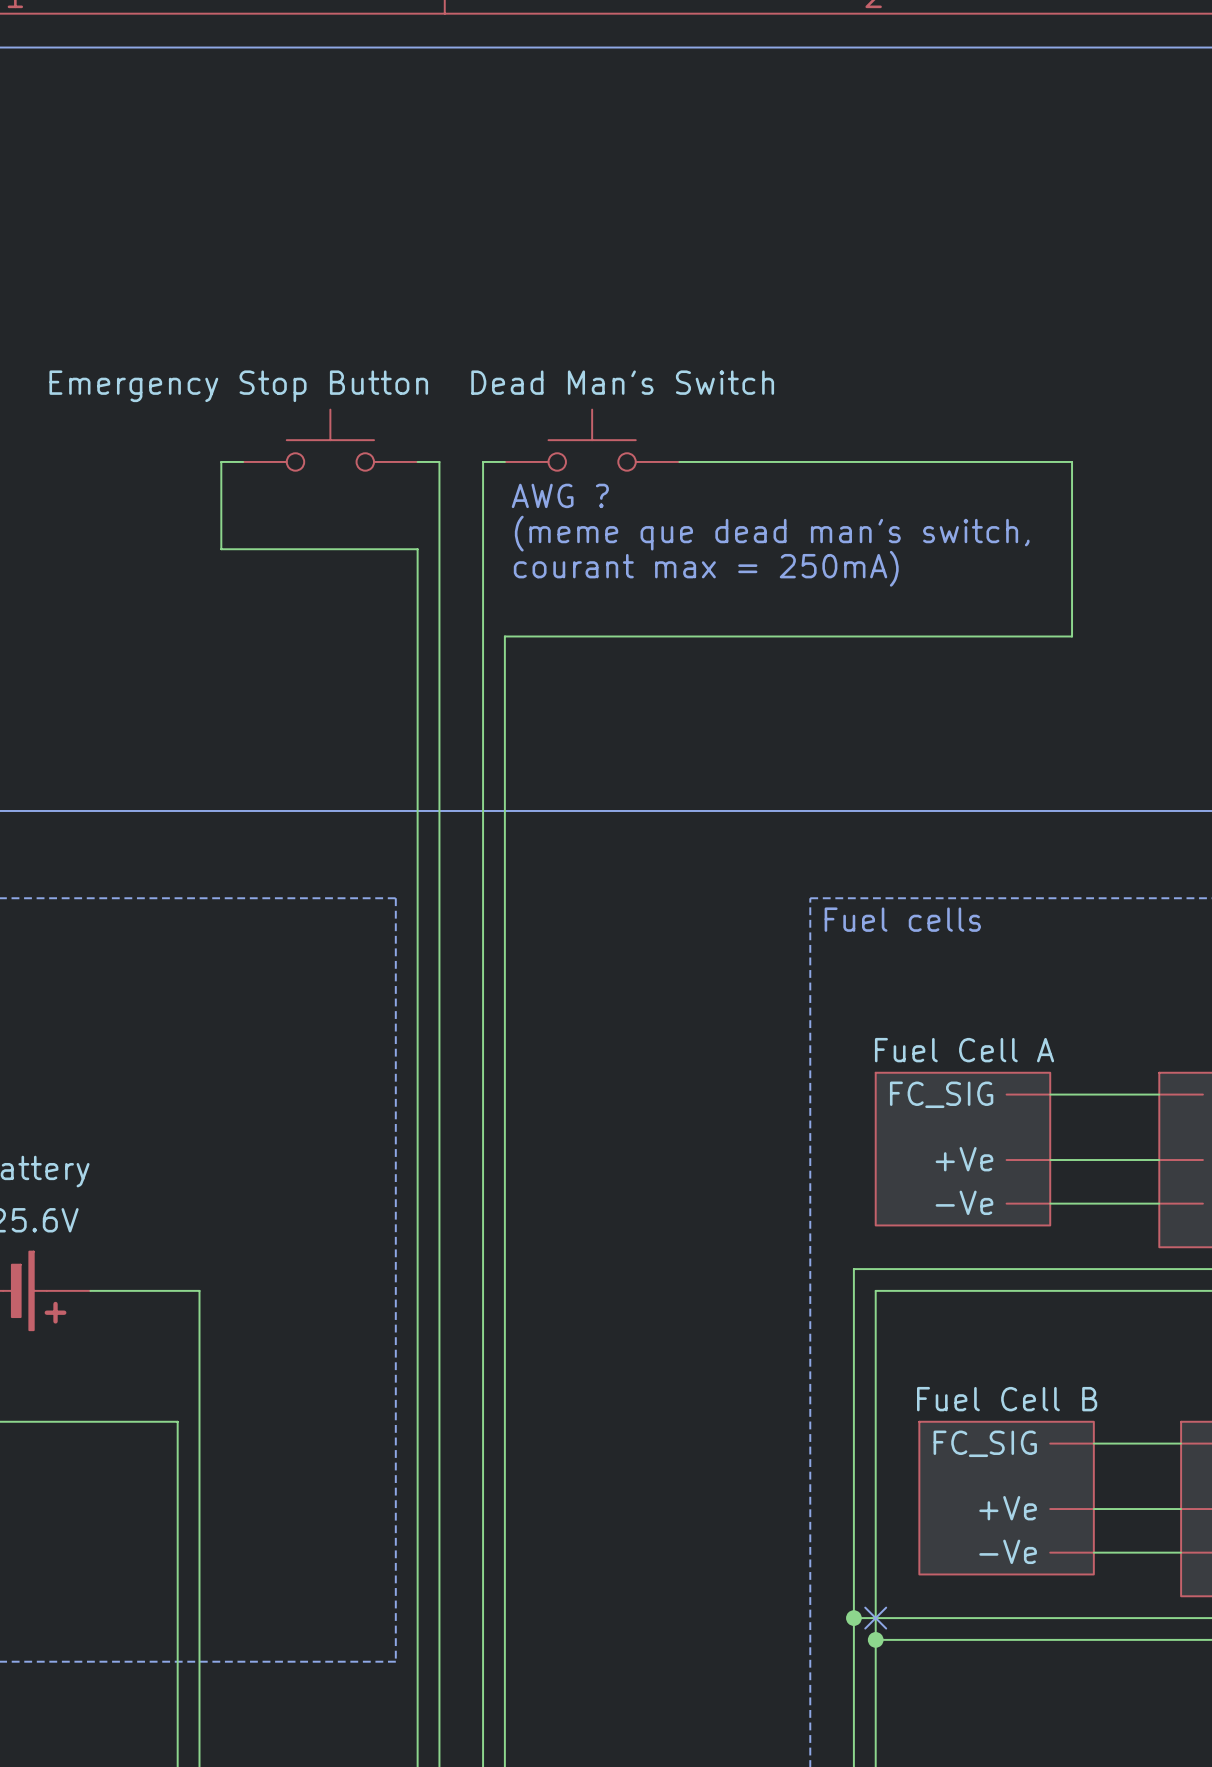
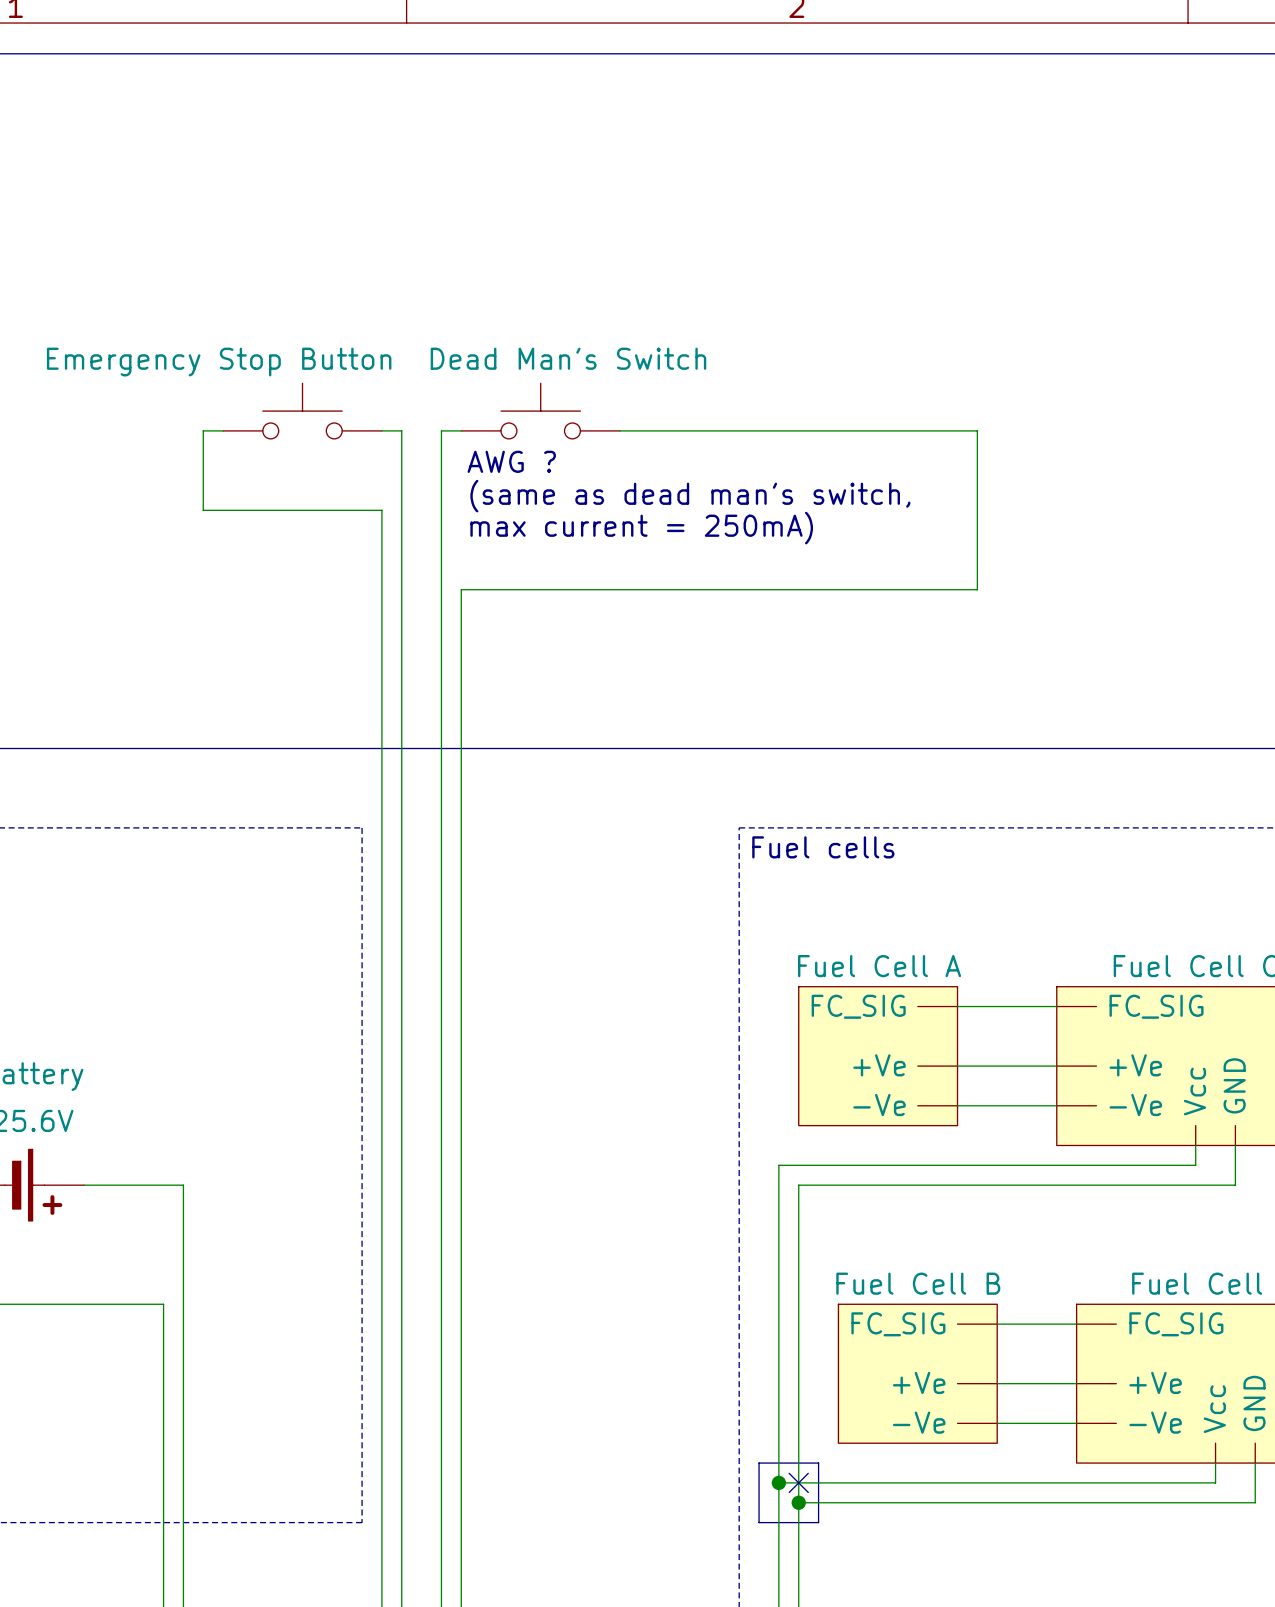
text: (meme que dead man's switch, (772, 533) -> (same as dead man's switch, (690, 496)
text: courant max = 250mA) (706, 568) -> max current = 250mA) (641, 528)
line: none -> (759, 1463) (818, 1463) (818, 1522) (759, 1522) (759, 1463)

